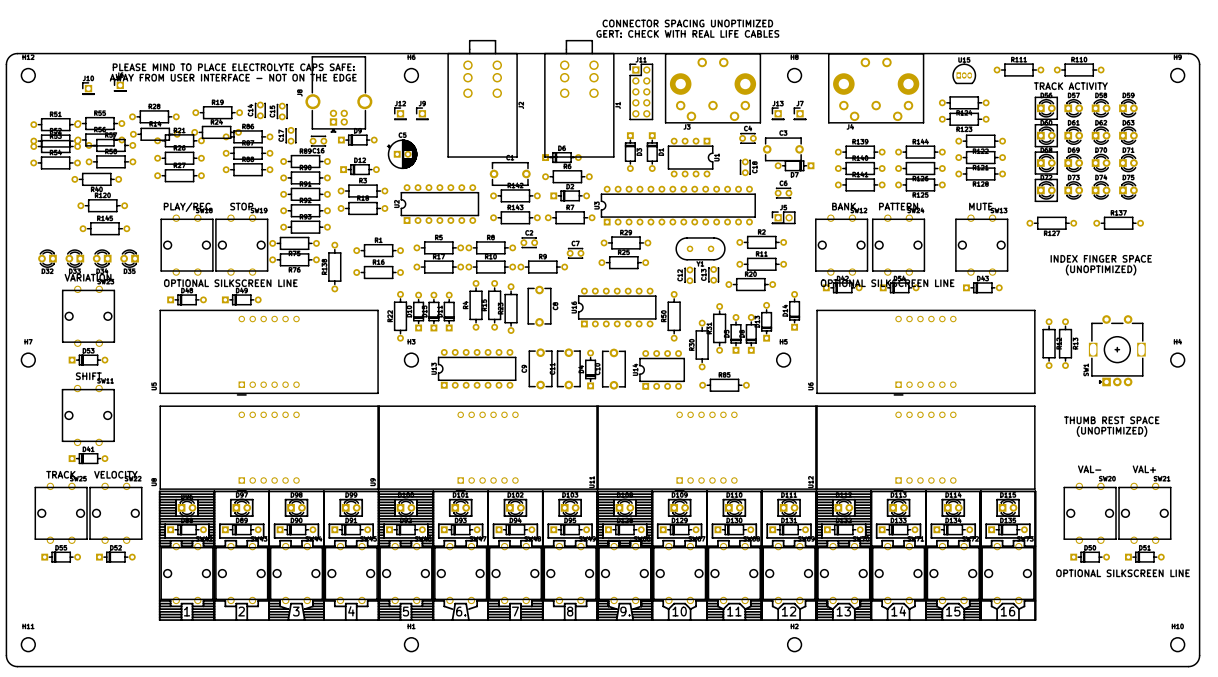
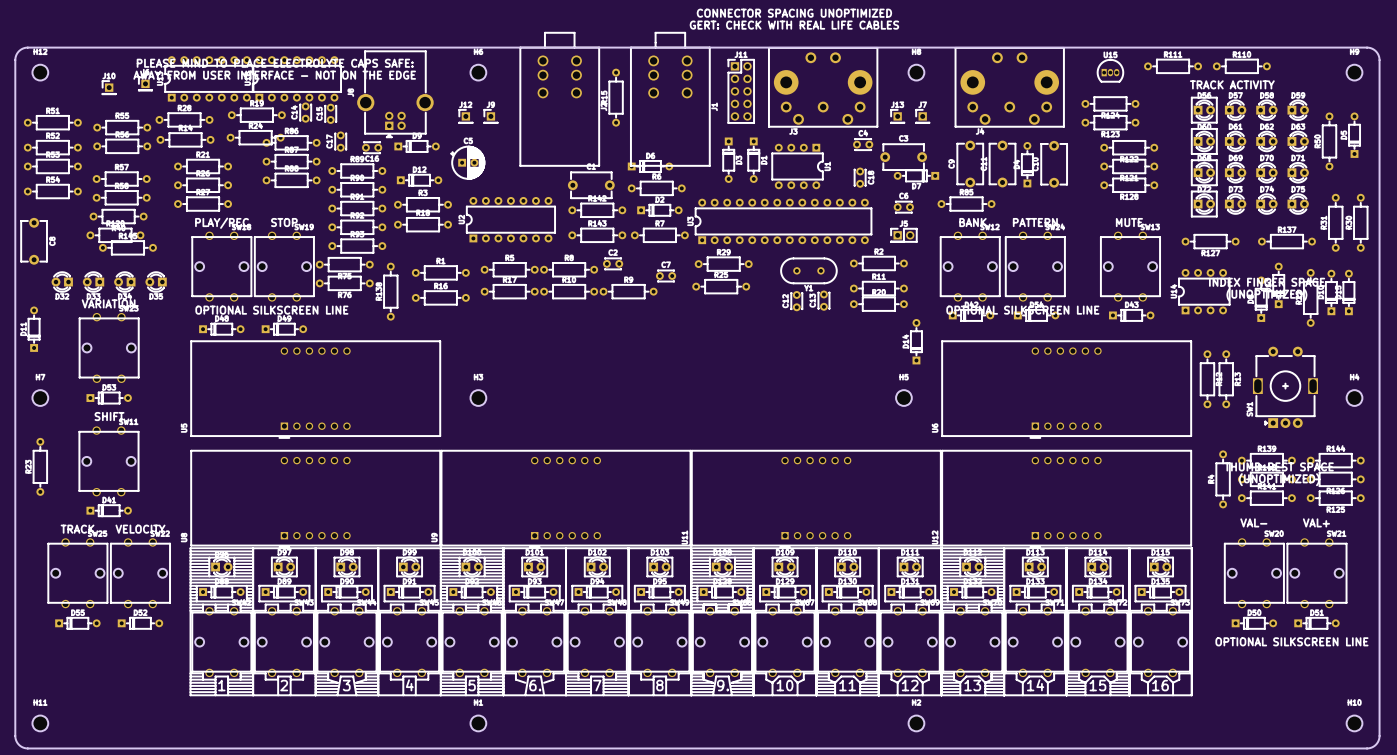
part position: (55, 124) -> (52, 122)
part position: (179, 140) -> (203, 166)
part position: (55, 141) -> (52, 147)
part position: (110, 145) -> (121, 179)
part position: (55, 146) -> (52, 166)
part position: (860, 152) -> (1266, 460)
part position: (920, 152) -> (1335, 460)
part position: (179, 158) -> (203, 185)
part position: (110, 161) -> (121, 197)
part position: (55, 162) -> (52, 191)
part position: (860, 168) -> (1266, 479)
part position: (920, 168) -> (1335, 479)
part position: (179, 175) -> (203, 204)
part position: (96, 179) -> (118, 216)
part position: (860, 184) -> (1266, 498)
part position: (920, 184) -> (1335, 498)
part position: (102, 205) -> (115, 235)
part position: (750, 284) -> (878, 304)
part position: (476, 305) -> (1223, 479)
part position: (494, 305) -> (616, 97)
part position: (539, 306) -> (34, 241)
part position: (617, 307) -> (296, 78)
part position: (511, 308) -> (40, 466)
part position: (418, 311) -> (1331, 292)
part position: (433, 311) -> (1348, 292)
part position: (449, 311) -> (34, 329)
part position: (400, 316) -> (1310, 297)
part position: (674, 316) -> (1329, 141)
part position: (766, 321) -> (1278, 285)
part position: (719, 328) -> (1335, 222)
part position: (736, 333) -> (1354, 135)
part position: (751, 333) -> (1261, 299)
part position: (702, 345) -> (1360, 222)
part position: (477, 368) -> (209, 78)
part position: (540, 368) -> (970, 164)
part position: (568, 368) -> (1002, 164)
part position: (590, 369) -> (1027, 164)
part position: (613, 369) -> (1054, 164)
part position: (662, 369) -> (1204, 291)
part position: (724, 385) -> (966, 204)

